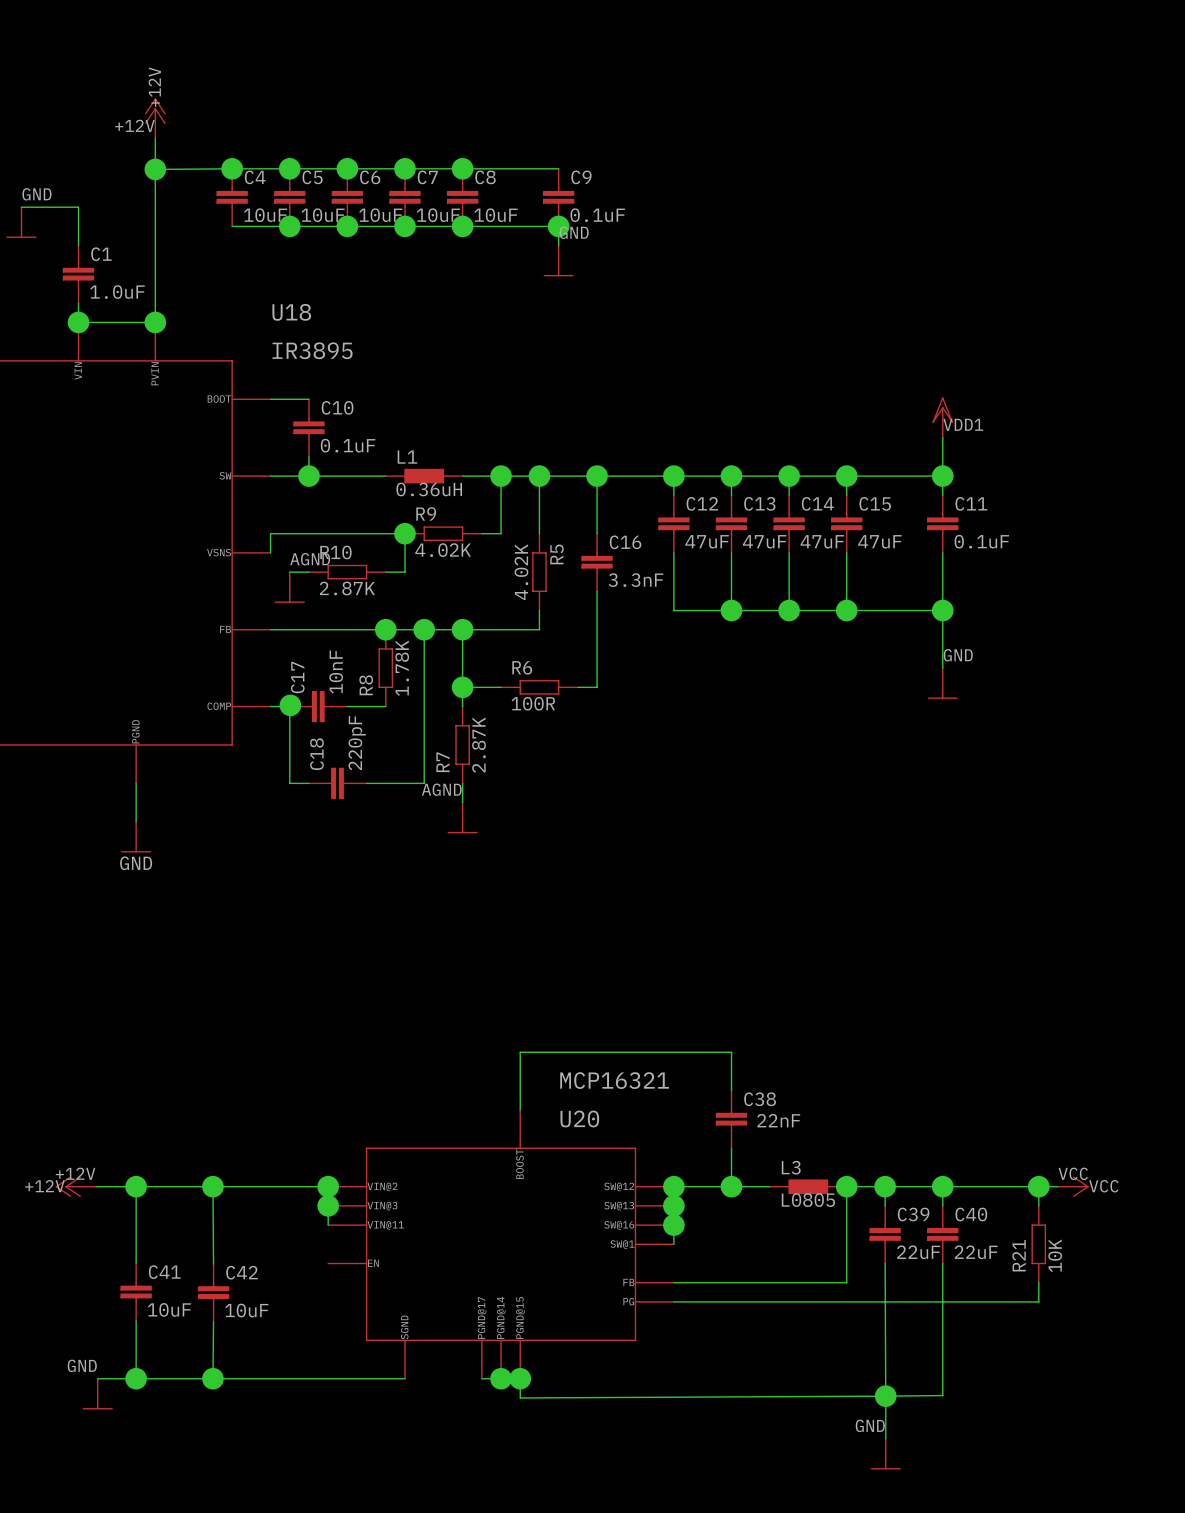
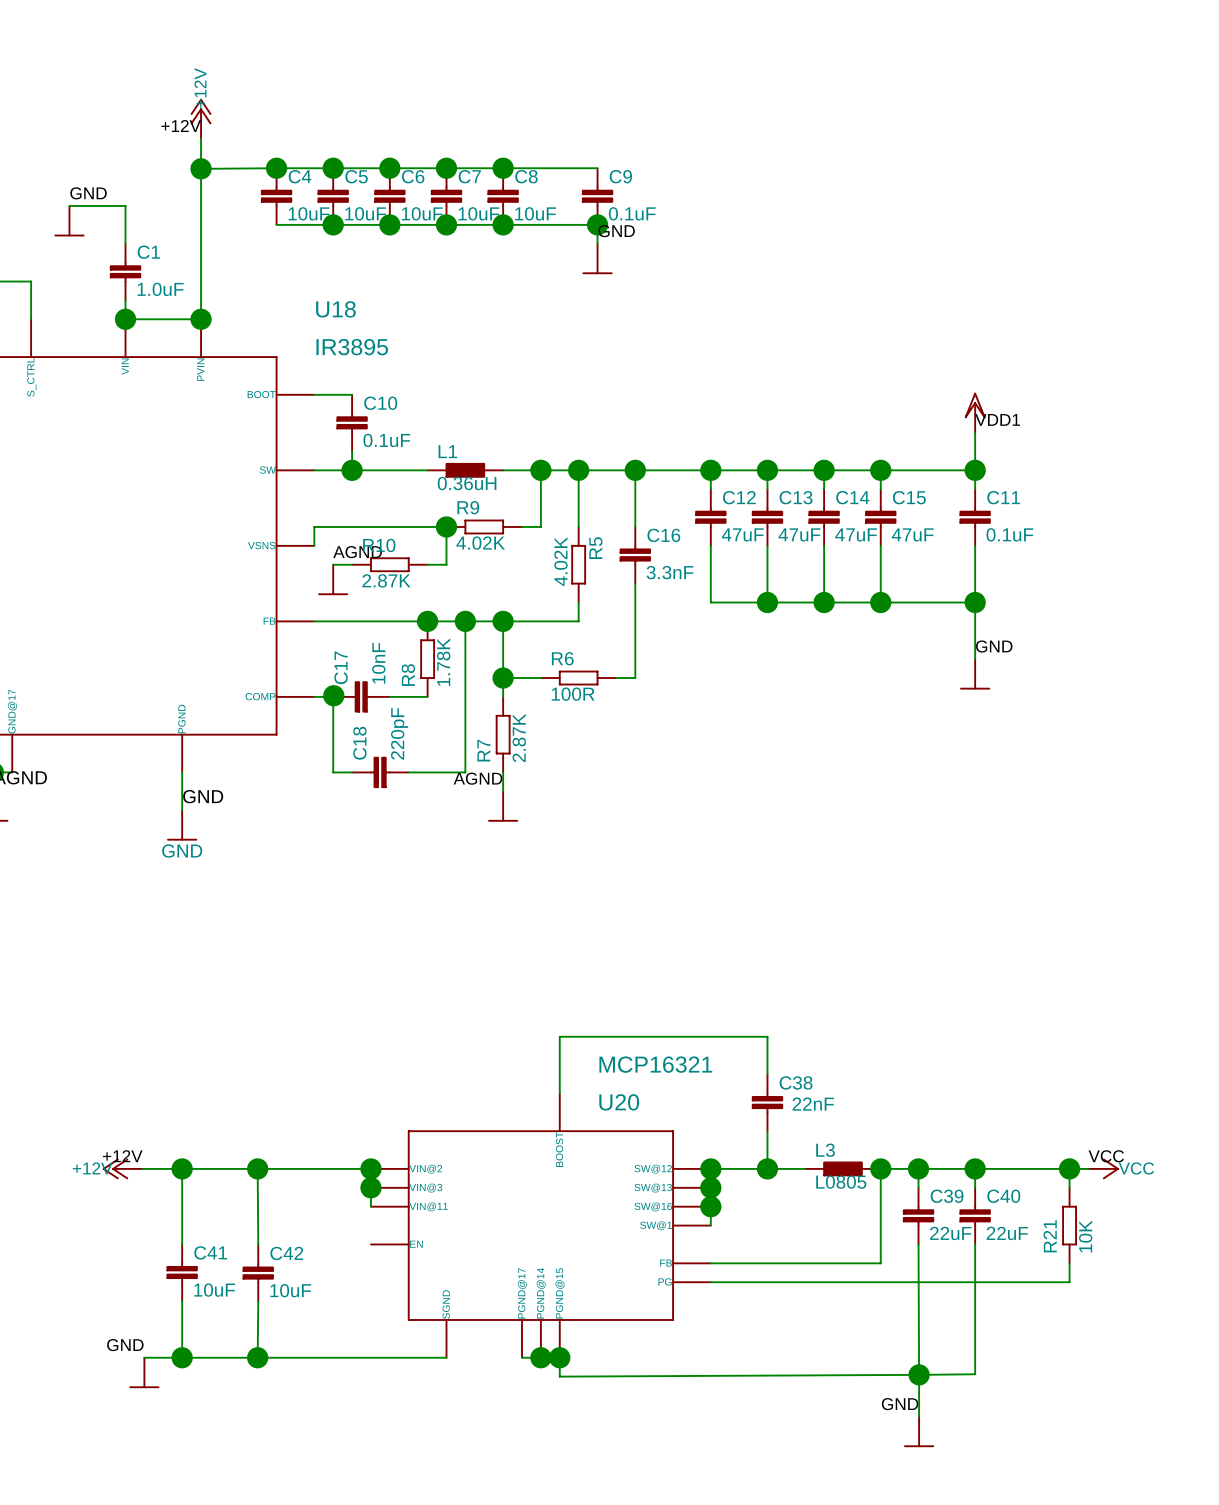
label: none -> GND (203, 796)

